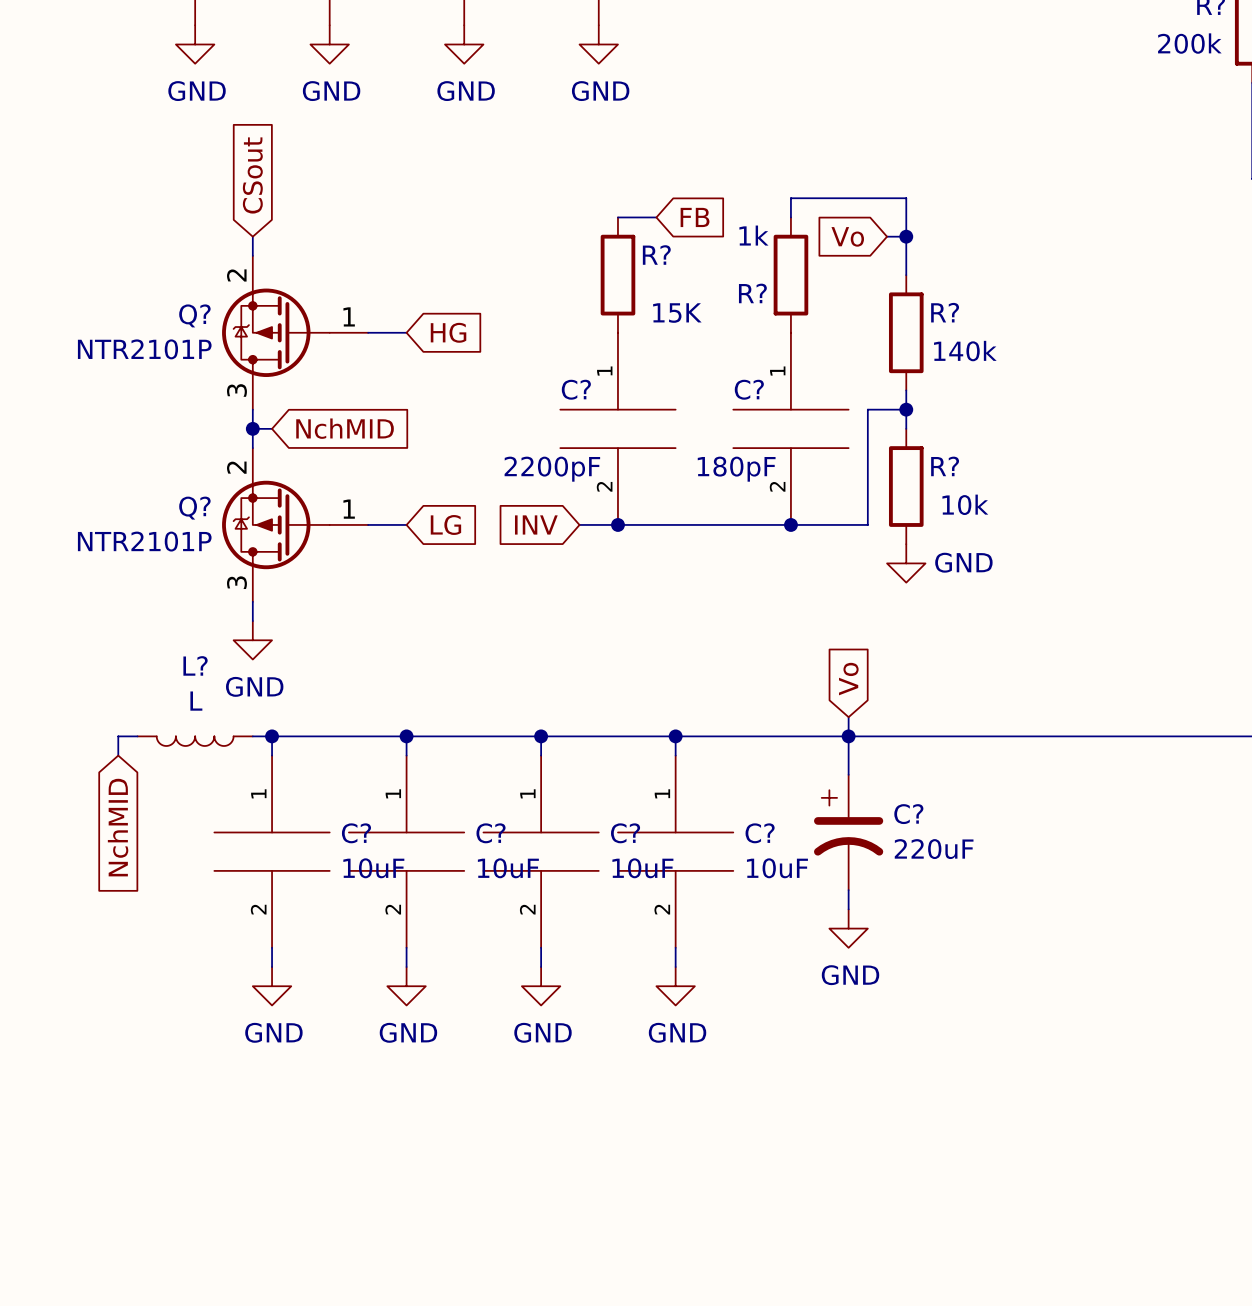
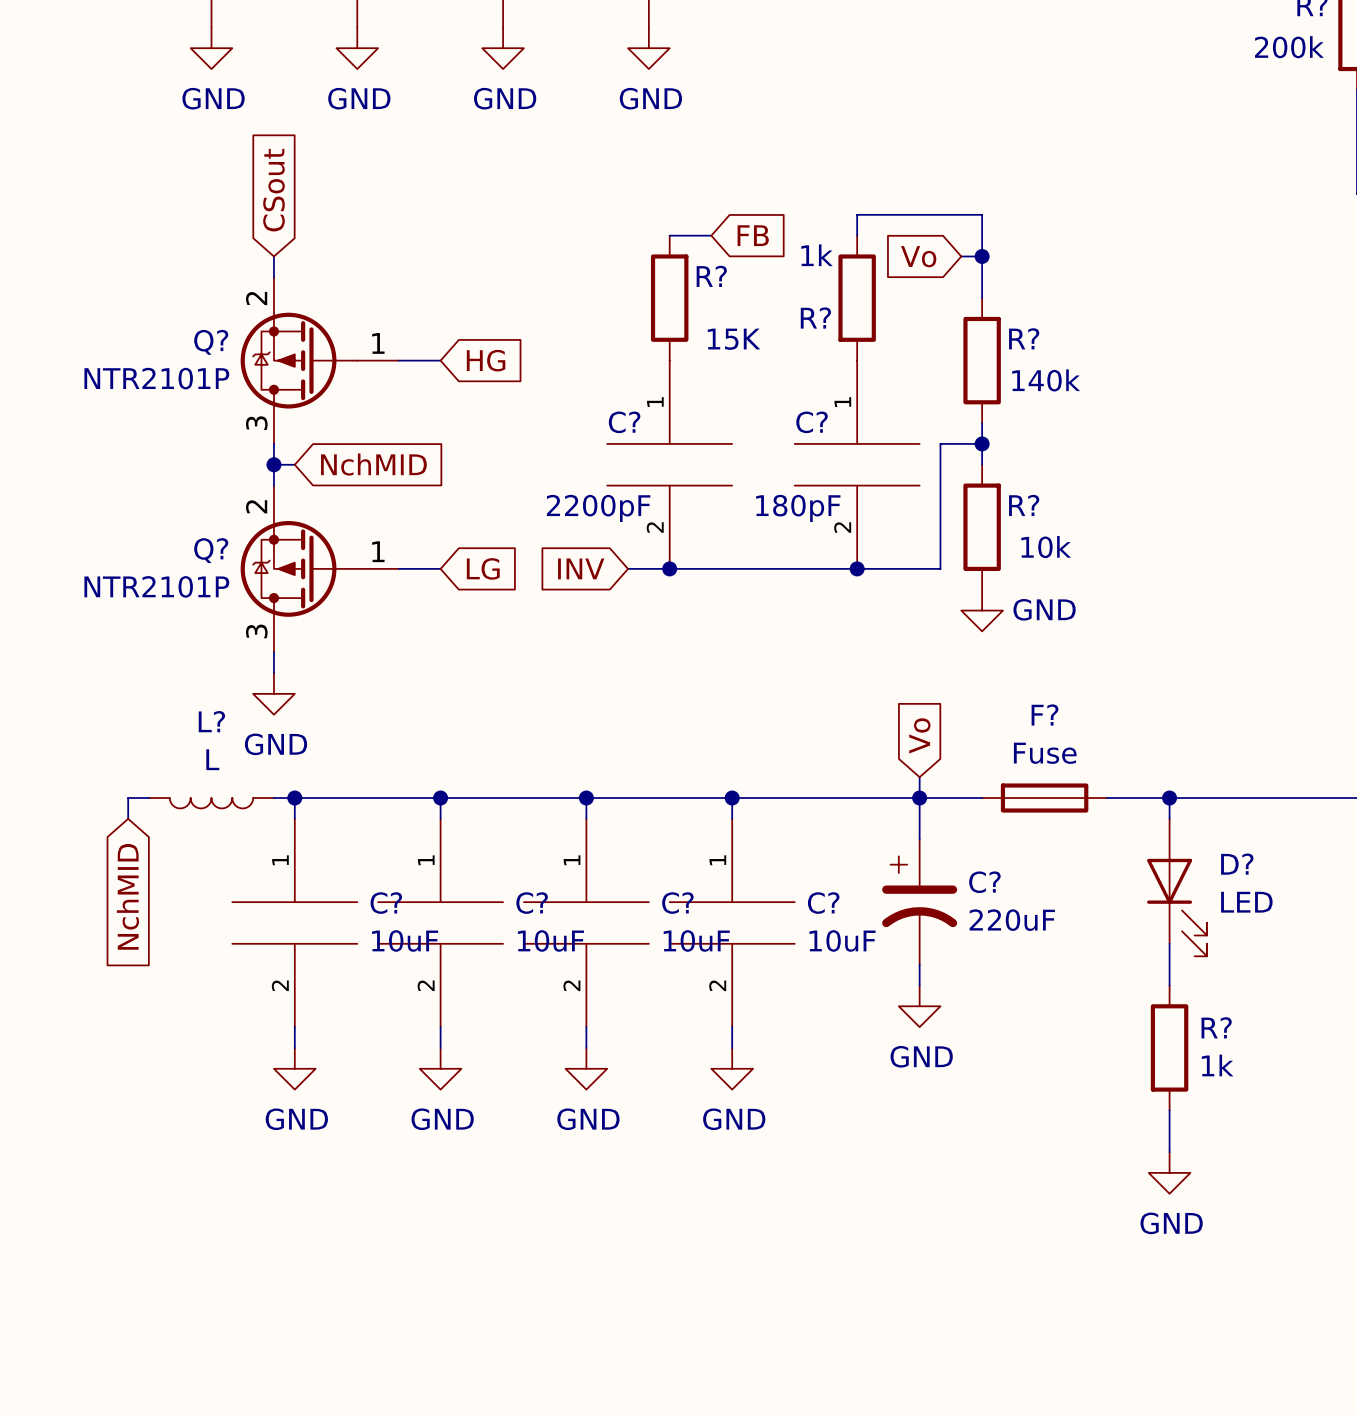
F?: none -> Fuse (1044, 798)
wire: none -> (1169, 798) (1169, 818)
junction: none -> (1169, 798)
D?: none -> LED (1177, 887)
wire: none -> (1169, 943) (1169, 985)
R?: none -> 1k (1169, 1047)
wire: none -> (1169, 1110) (1169, 1152)
power symbol: none -> GND (1169, 1172)

